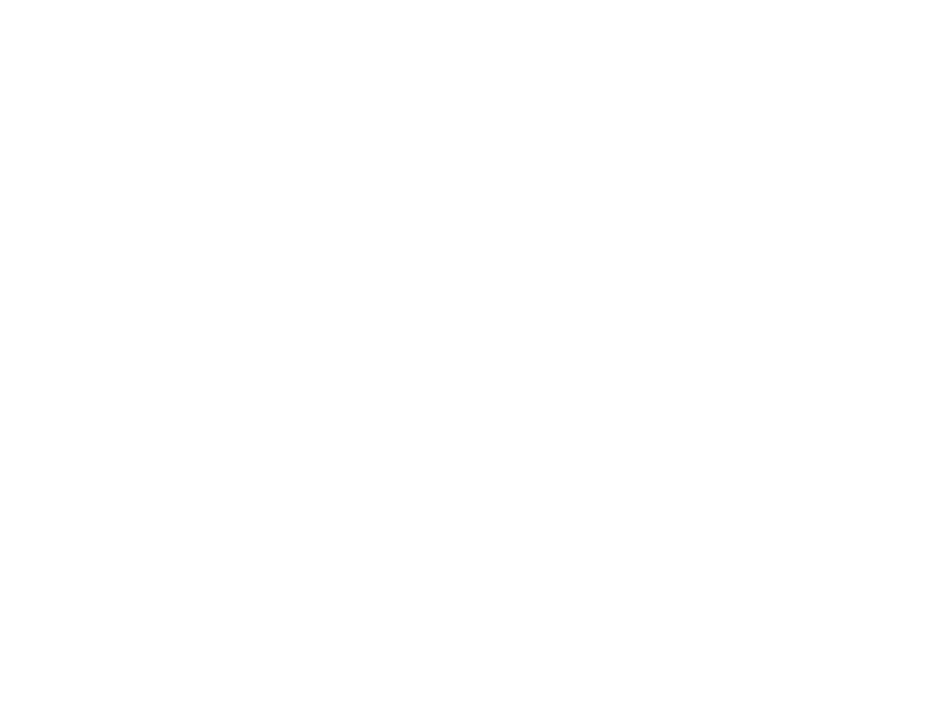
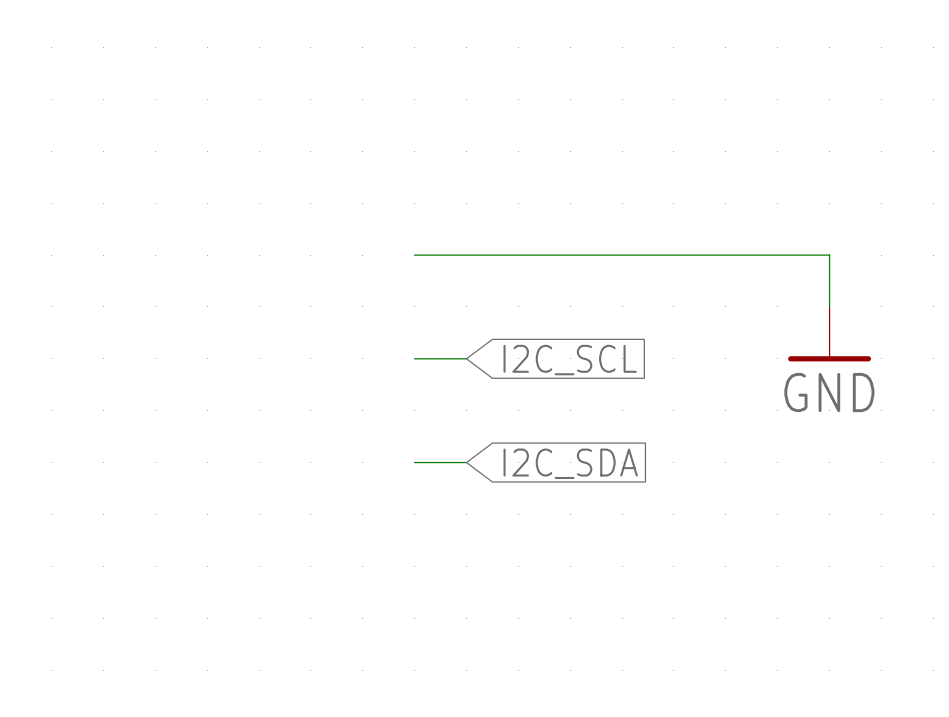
wire: none -> (414, 255) (829, 255) (829, 306)
power symbol: none -> GND (829, 334)
wire: none -> (414, 358) (466, 358)
global label: none -> I2C_SCL (570, 360)
wire: none -> (414, 462) (466, 462)
global label: none -> I2C_SDA (570, 463)

